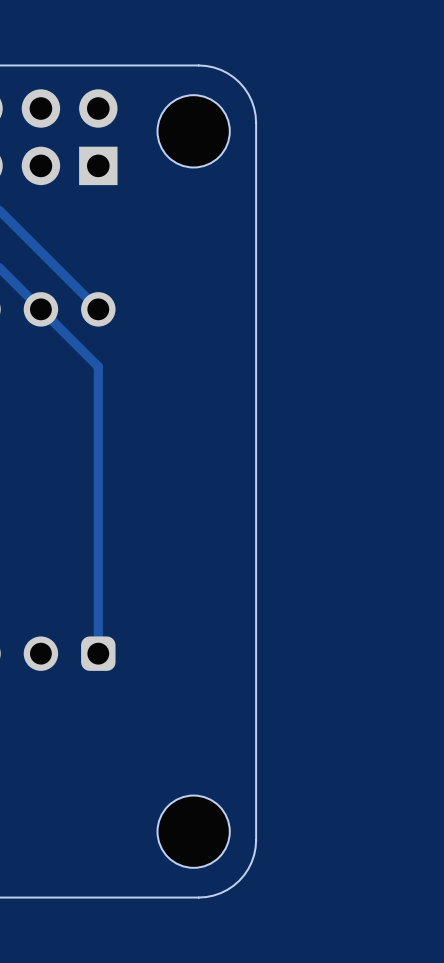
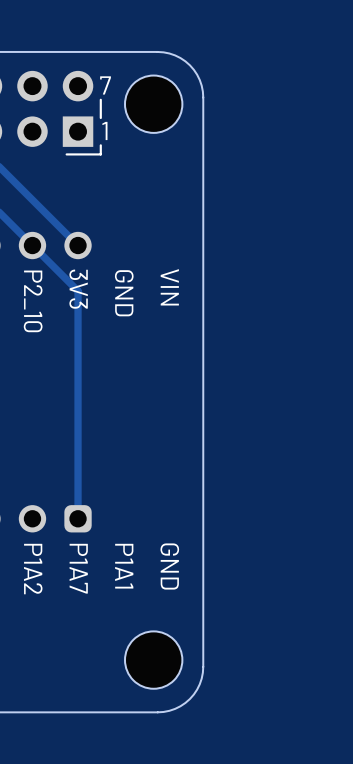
text: none -> 7 (105, 85)
line: none -> (100, 99) (100, 117)
text: none -> 1 (104, 130)
line: none -> (100, 145) (100, 154) (66, 154)
text: none -> VIN (169, 287)
text: none -> 3V3 (78, 289)
text: none -> GND (124, 293)
text: none -> P2_10 (33, 301)
text: none -> P1A1 (124, 566)
text: none -> GND (169, 566)
text: none -> P1A7 (78, 568)
text: none -> P1A2 (33, 569)

